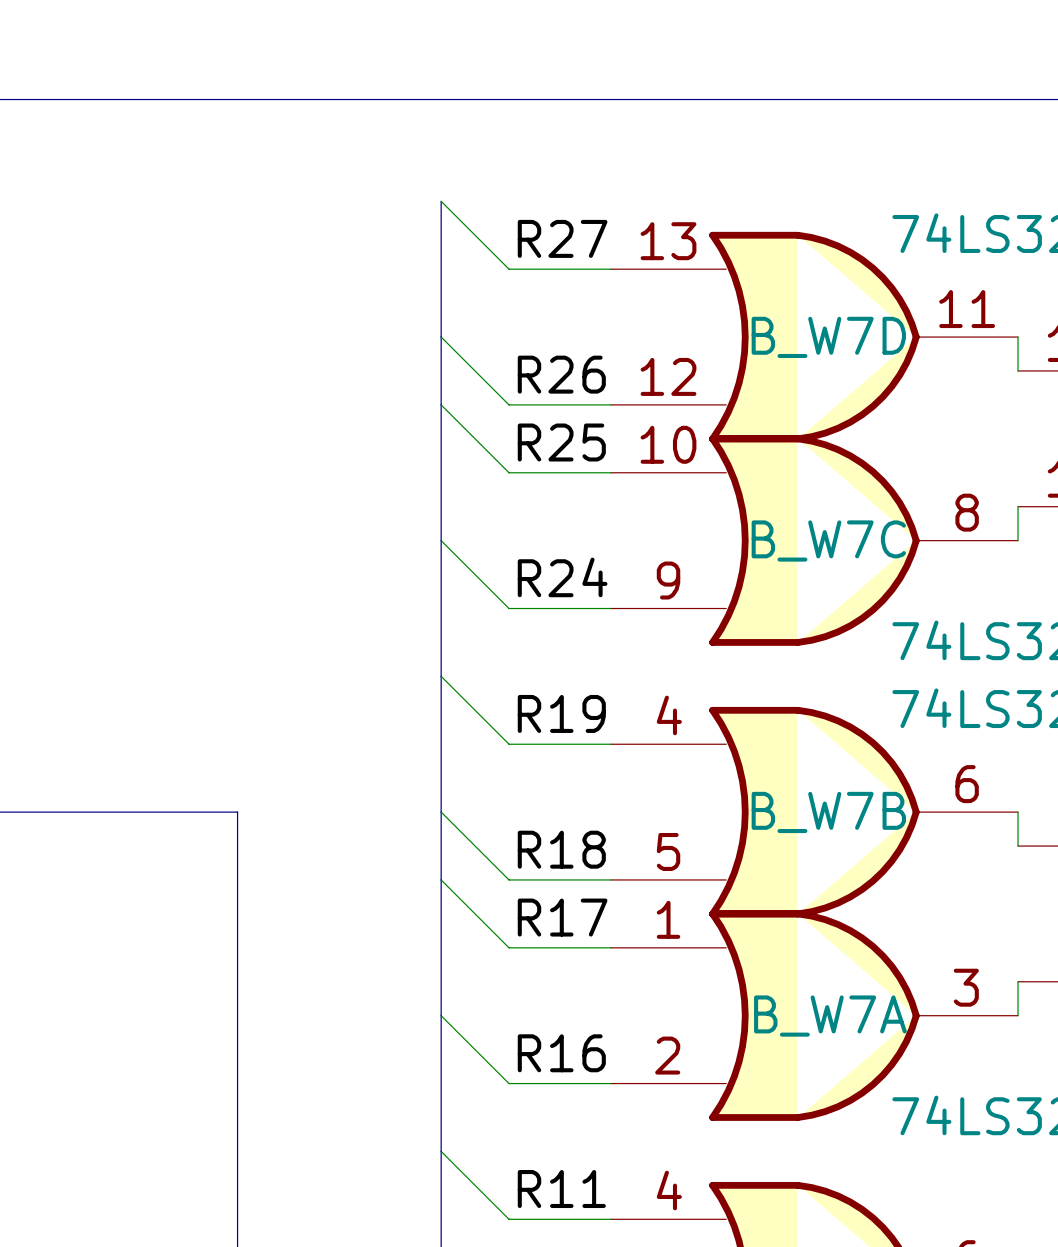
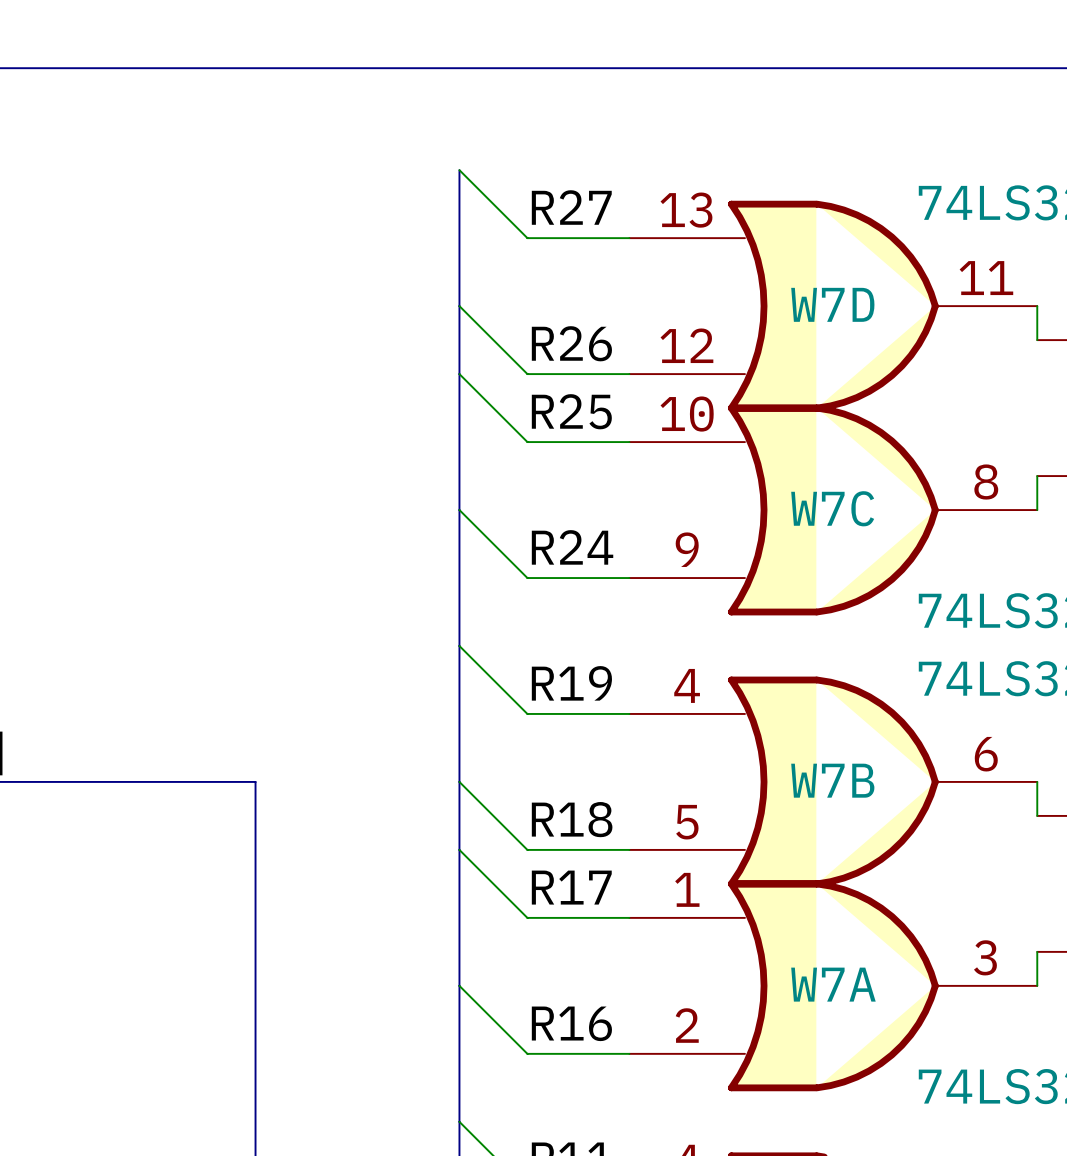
B_W7D name: B_W7D (828, 337) -> W7D (832, 304)
B_W7C name: B_W7C (828, 540) -> W7C (832, 508)
B_W7B name: B_W7B (828, 812) -> W7B (832, 780)
B_W7A name: B_W7A (830, 1016) -> W7A (833, 984)

